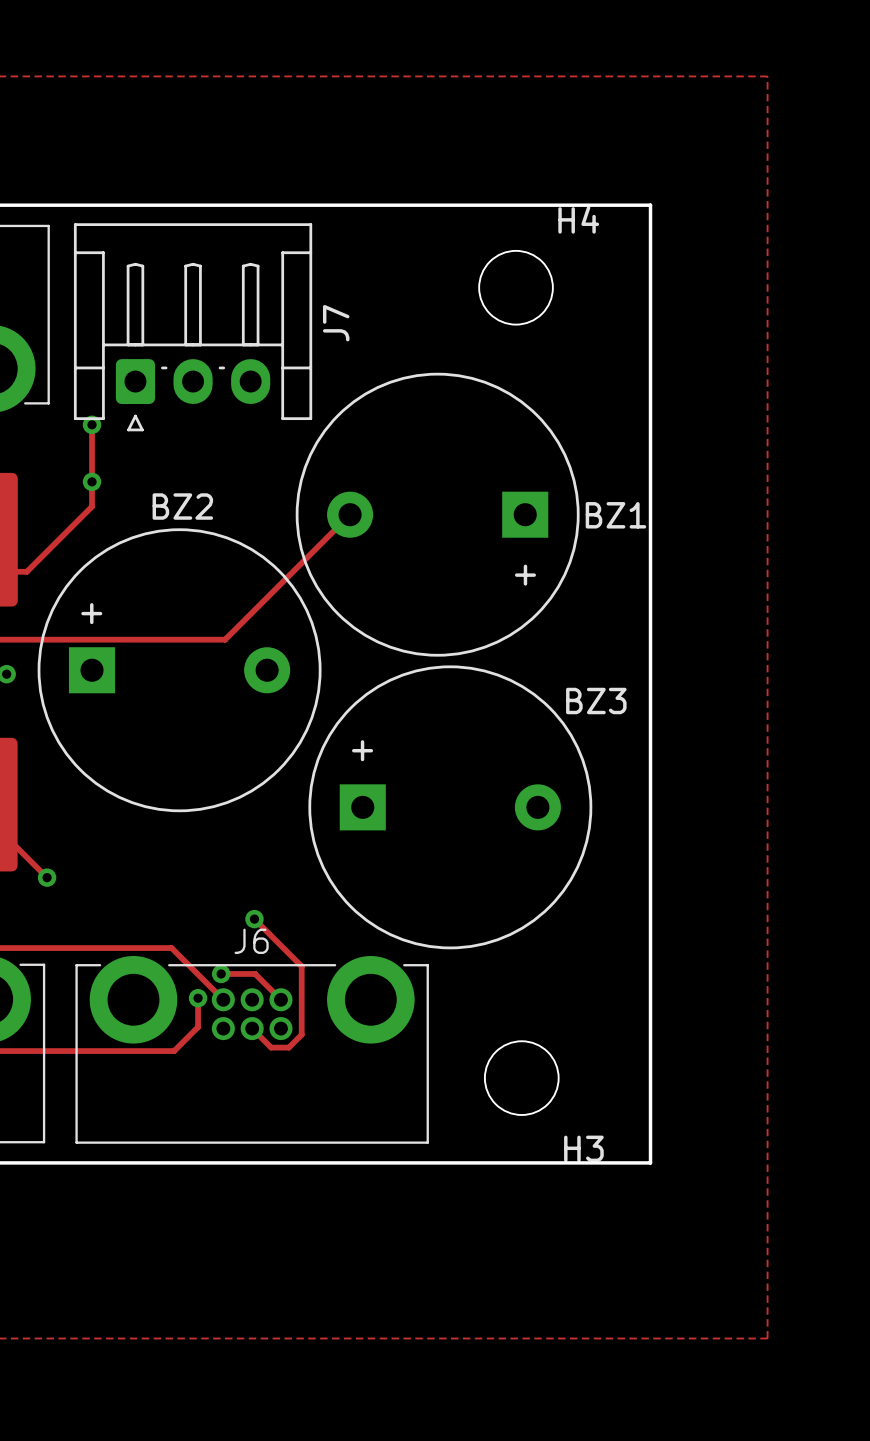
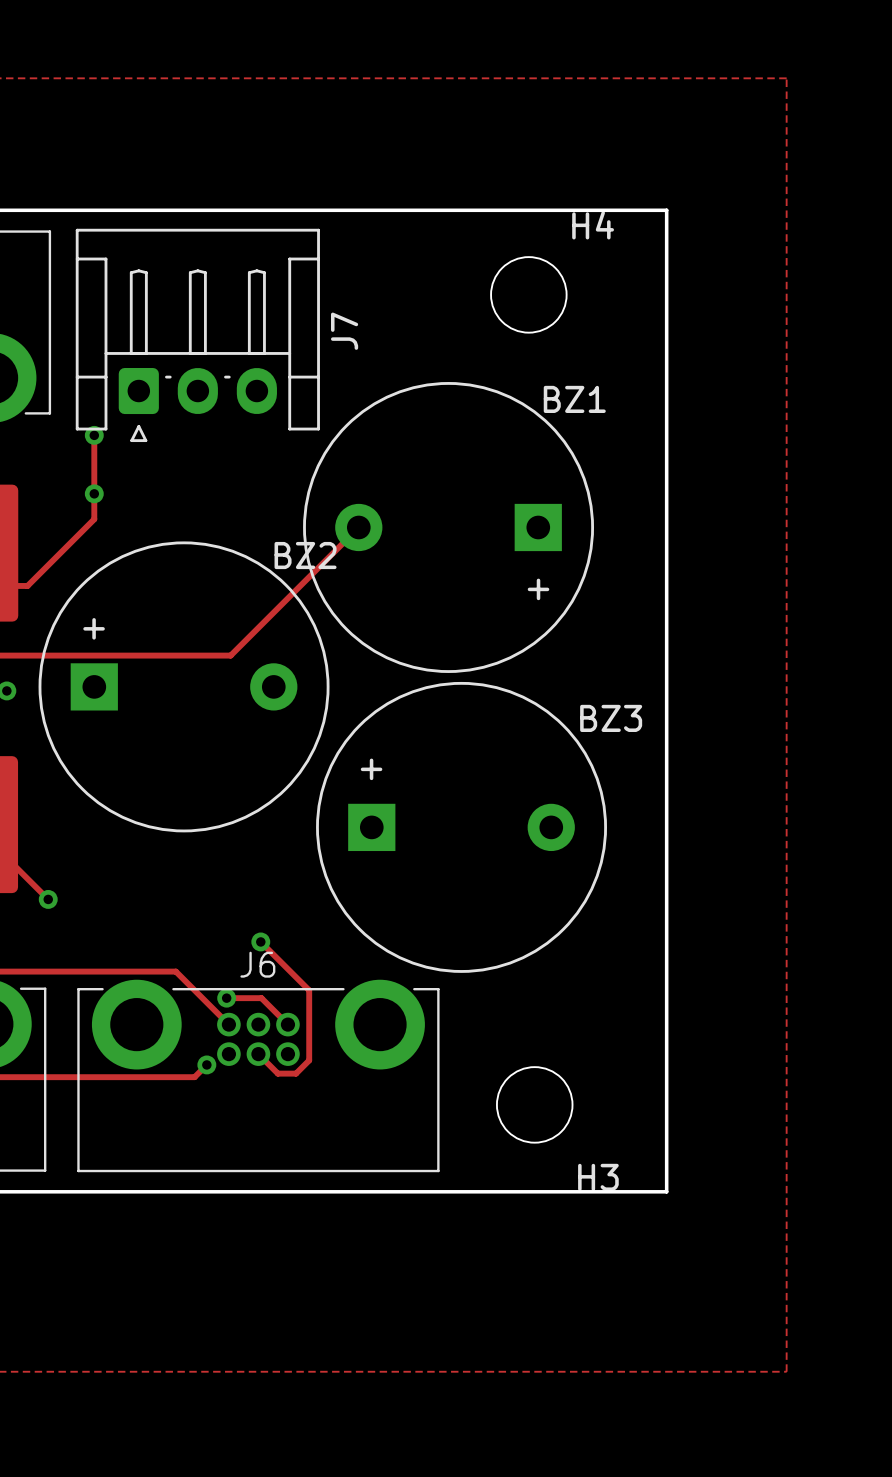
BZ2 name position: BZ2 (182, 506) -> BZ2 (305, 555)
BZ1 name position: BZ1 (615, 515) -> BZ1 (574, 399)
track: (198, 998) (198, 1027) (174, 1051) -> (206, 1064) (194, 1077) (178, 1077)
via position: (198, 998) -> (206, 1064)

